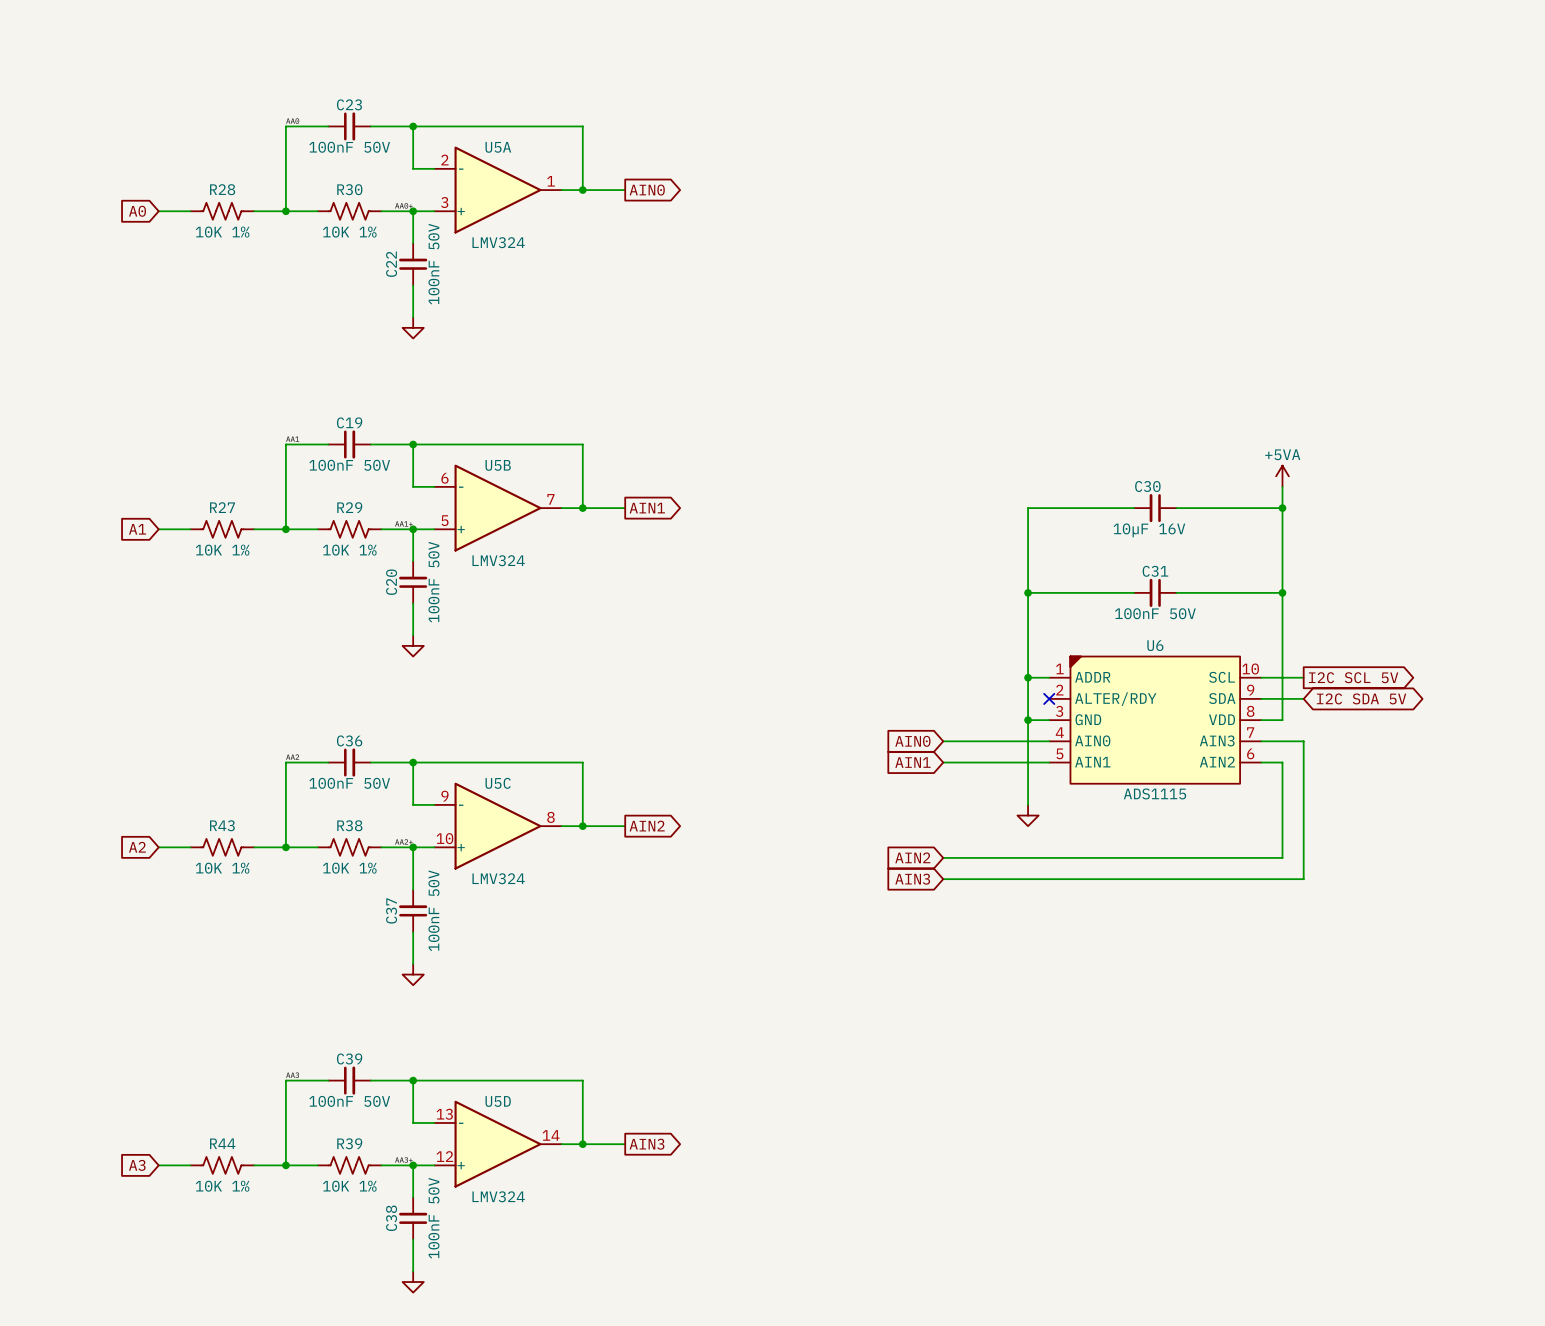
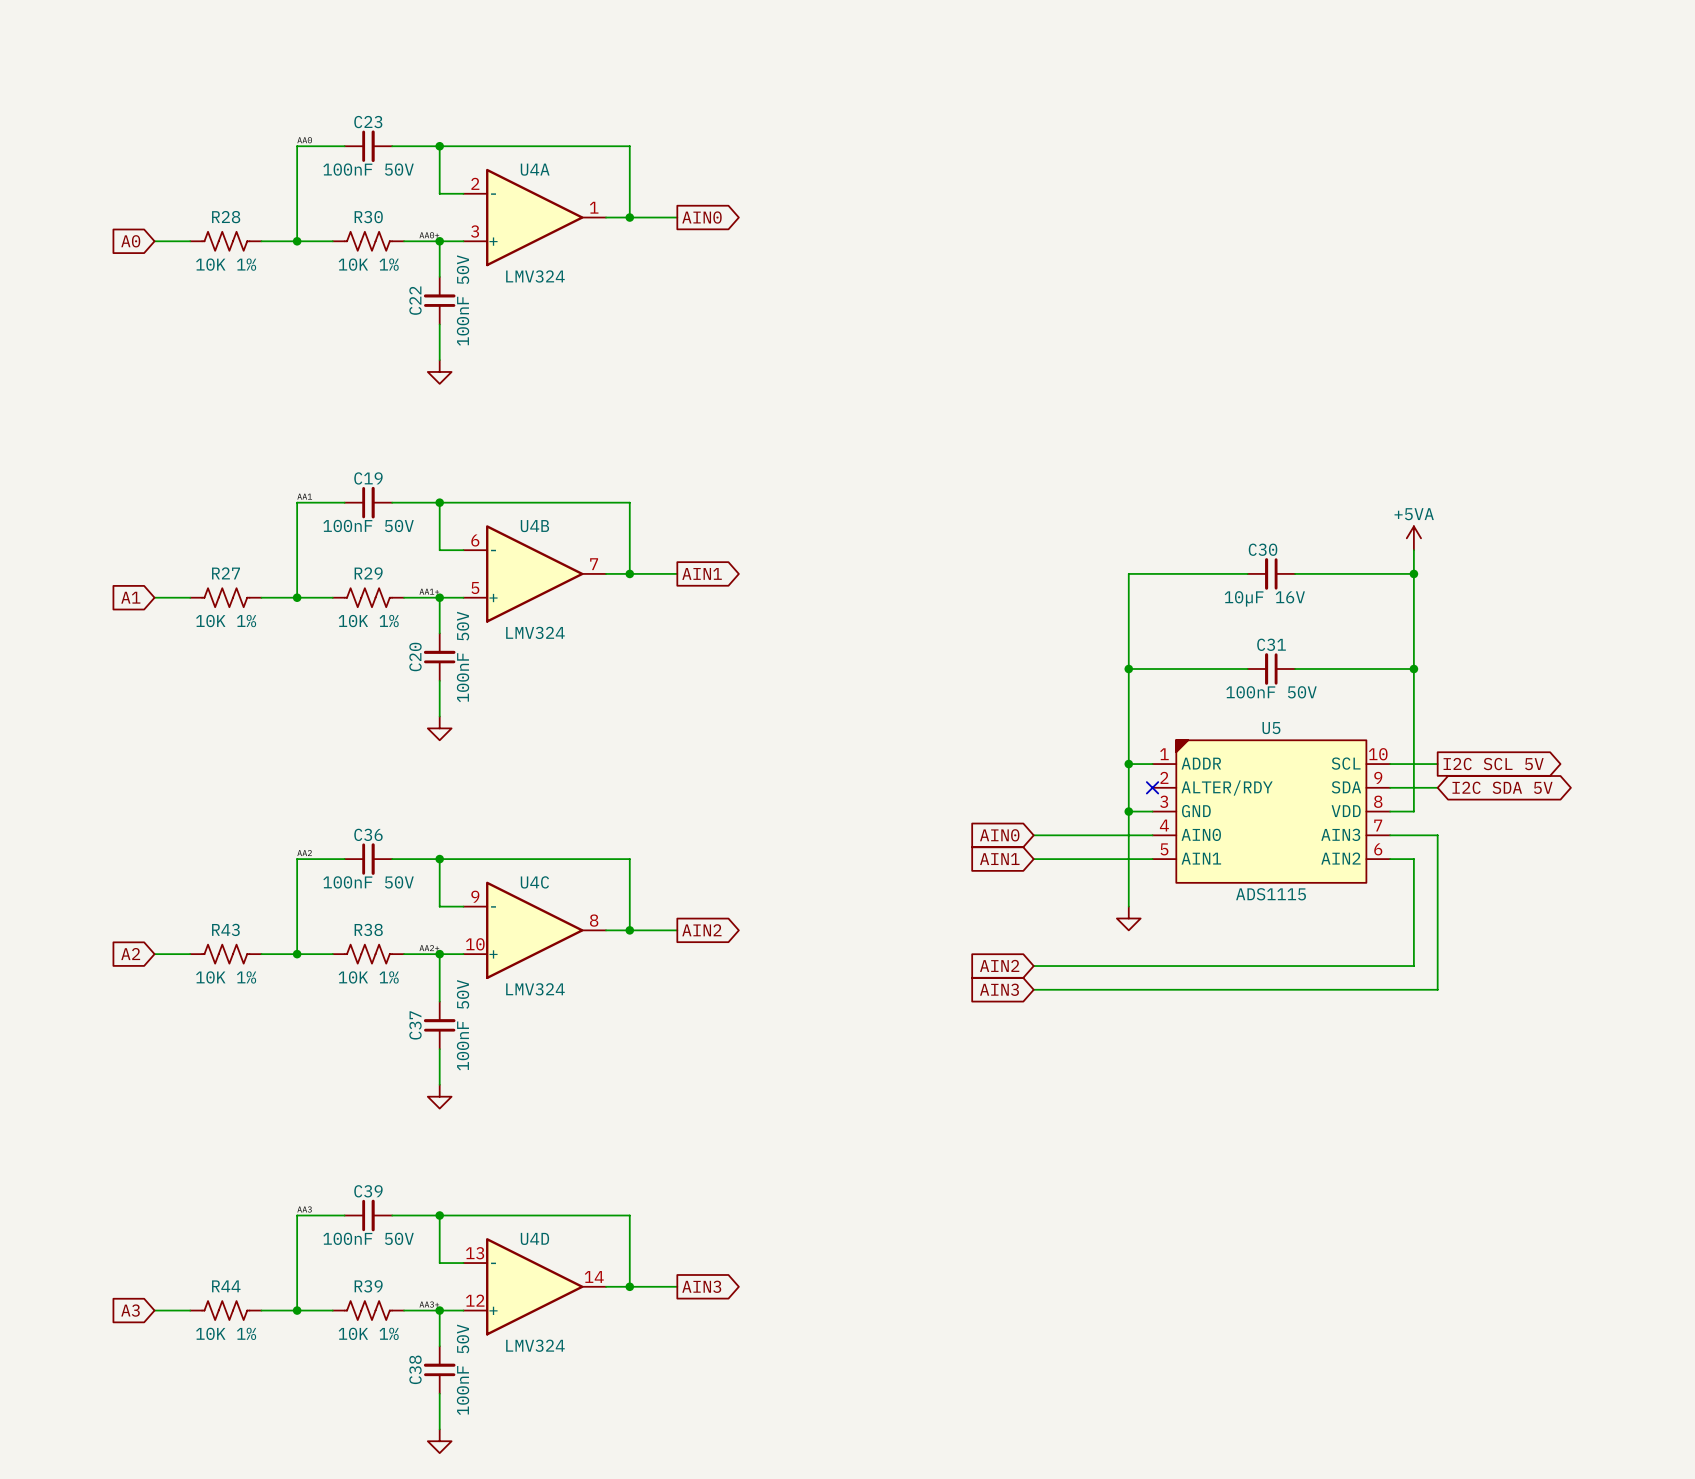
U5A name: U5A (498, 147) -> U4A (535, 169)
U5B name: U5B (498, 465) -> U4B (534, 526)
U6 name: U6 (1155, 645) -> U5 (1271, 728)
U5C name: U5C (498, 783) -> U4C (534, 882)
U5D name: U5D (498, 1101) -> U4D (534, 1238)

